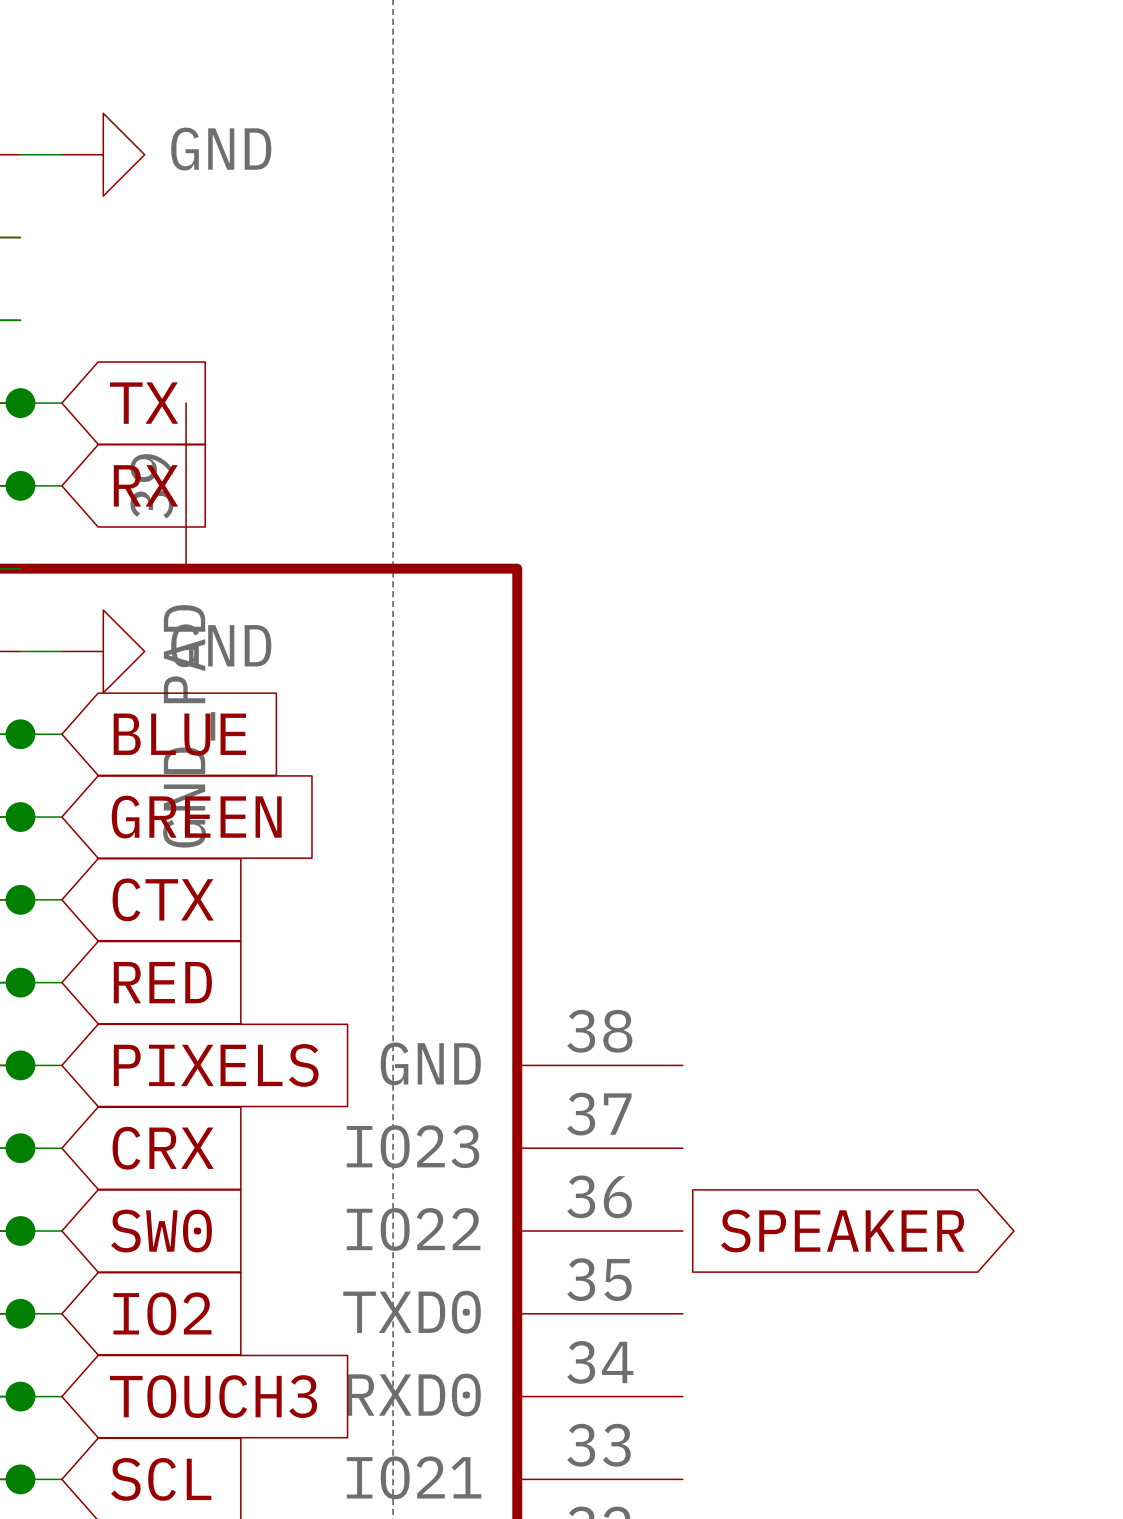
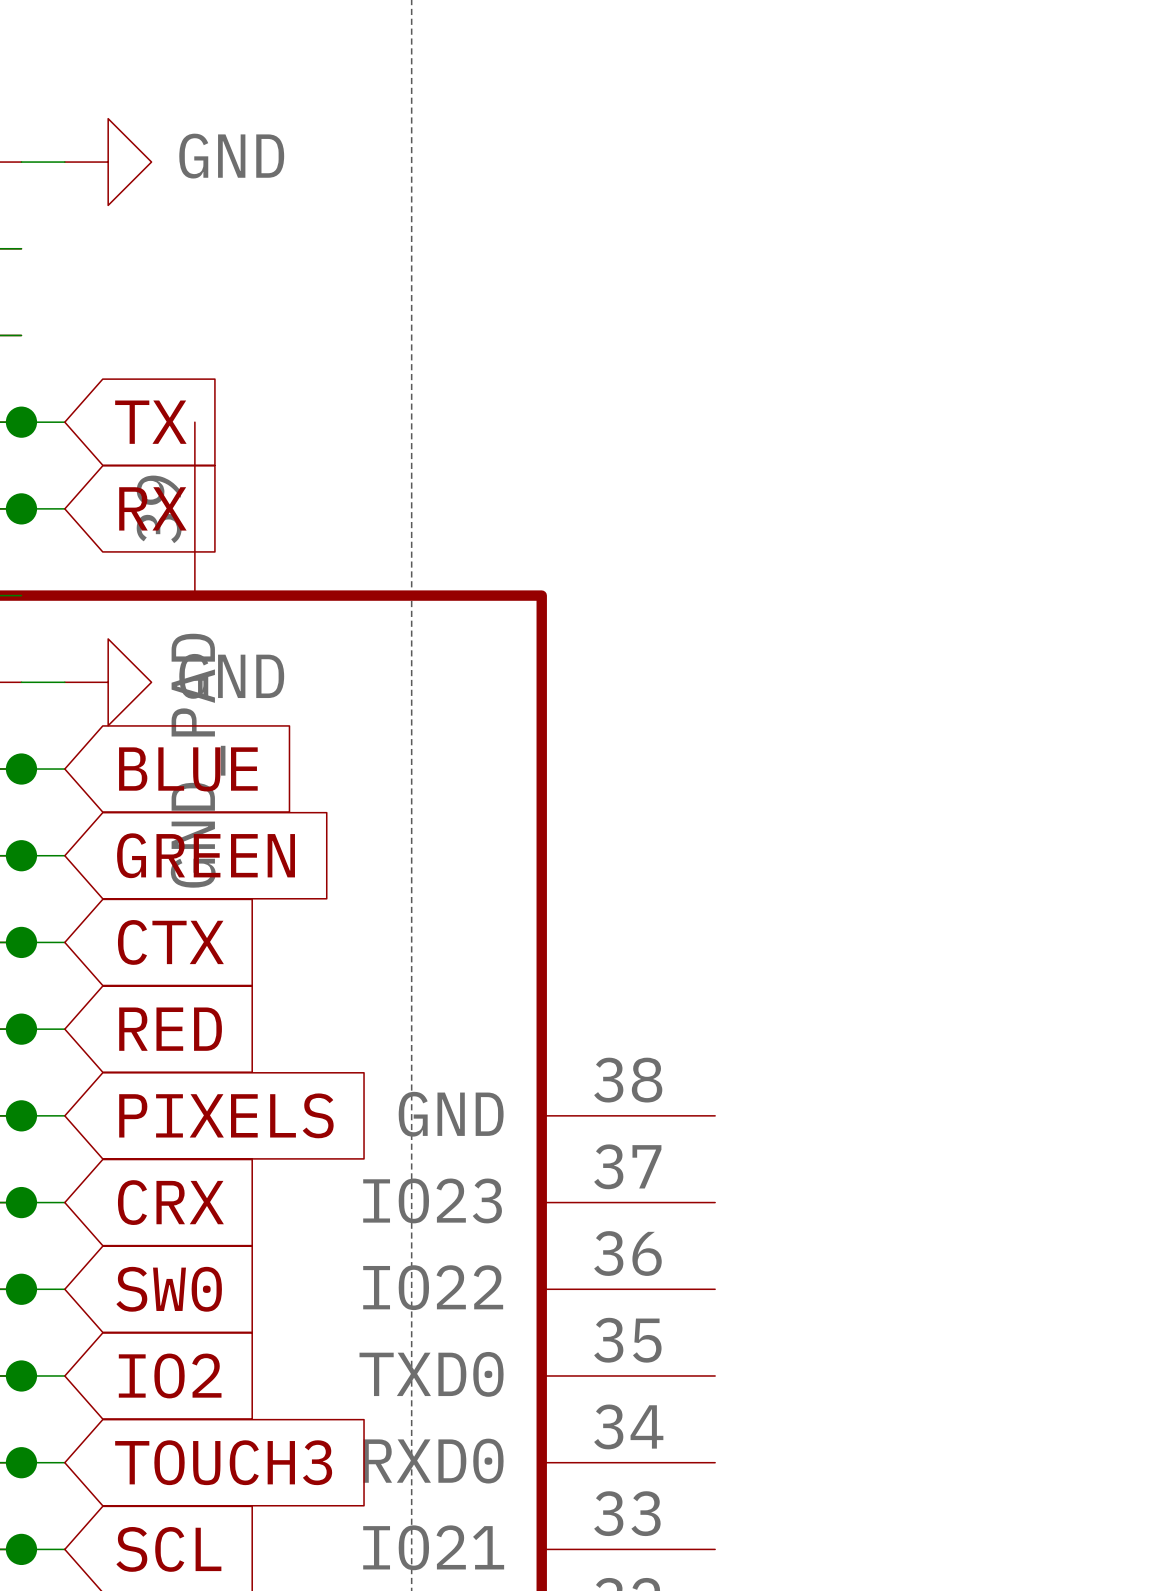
global label: SPEAKER (842, 1231) -> none

